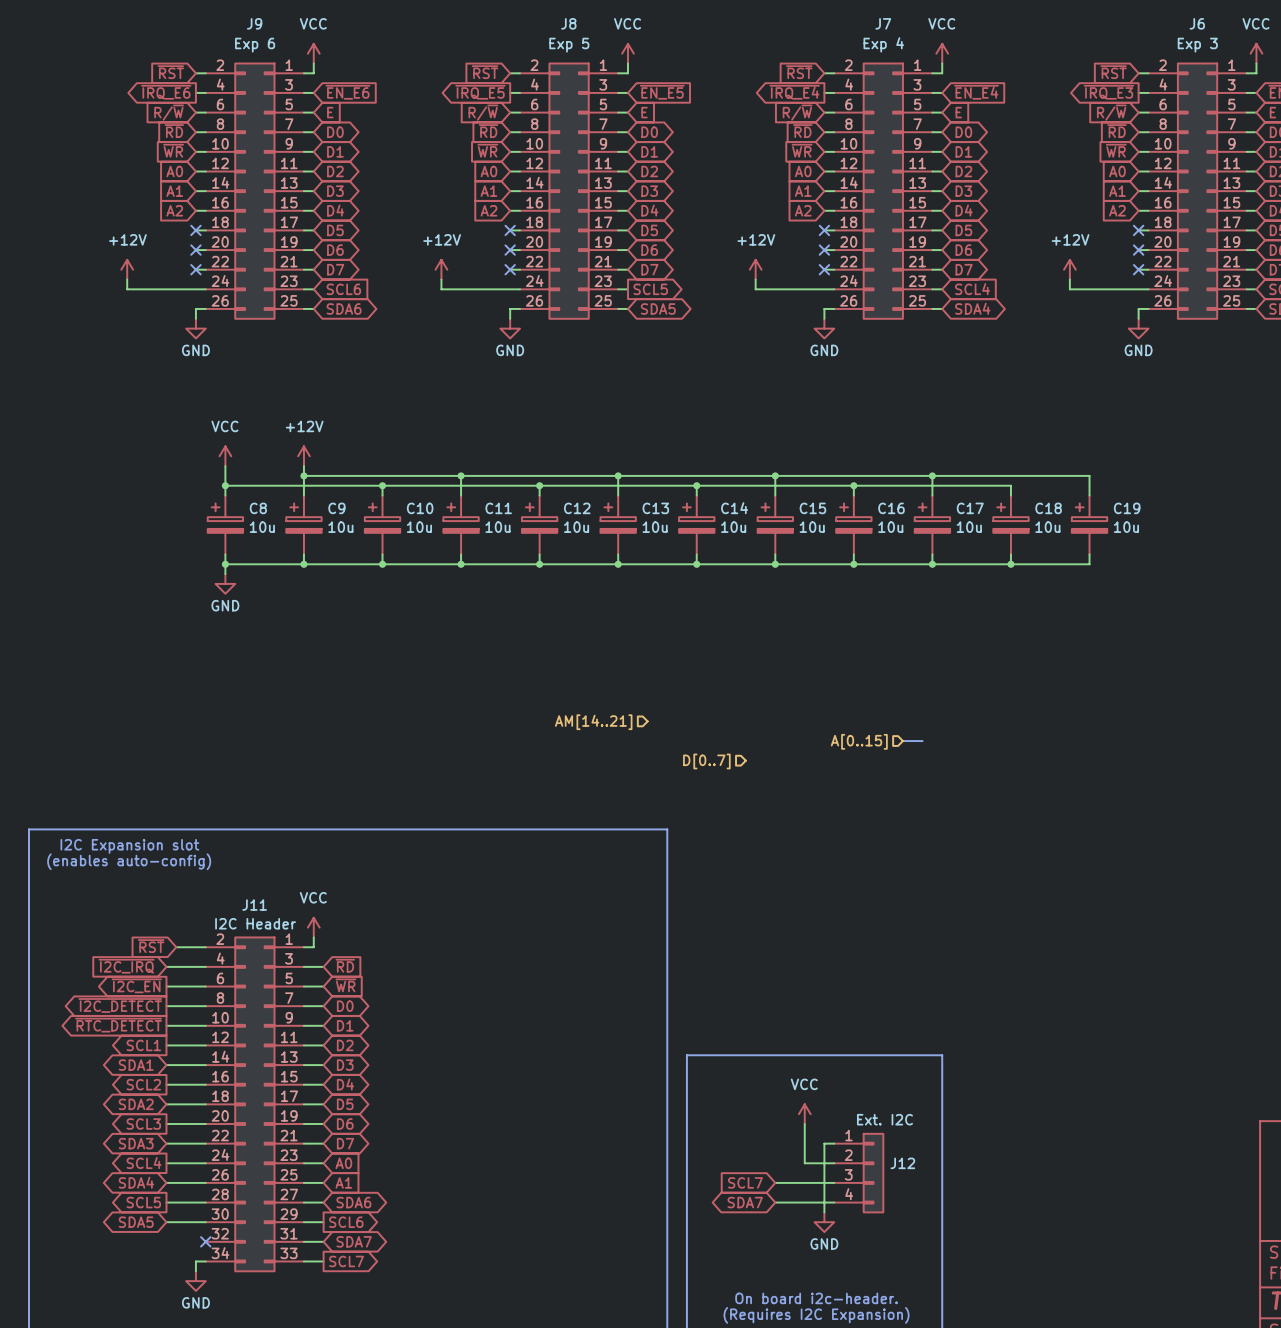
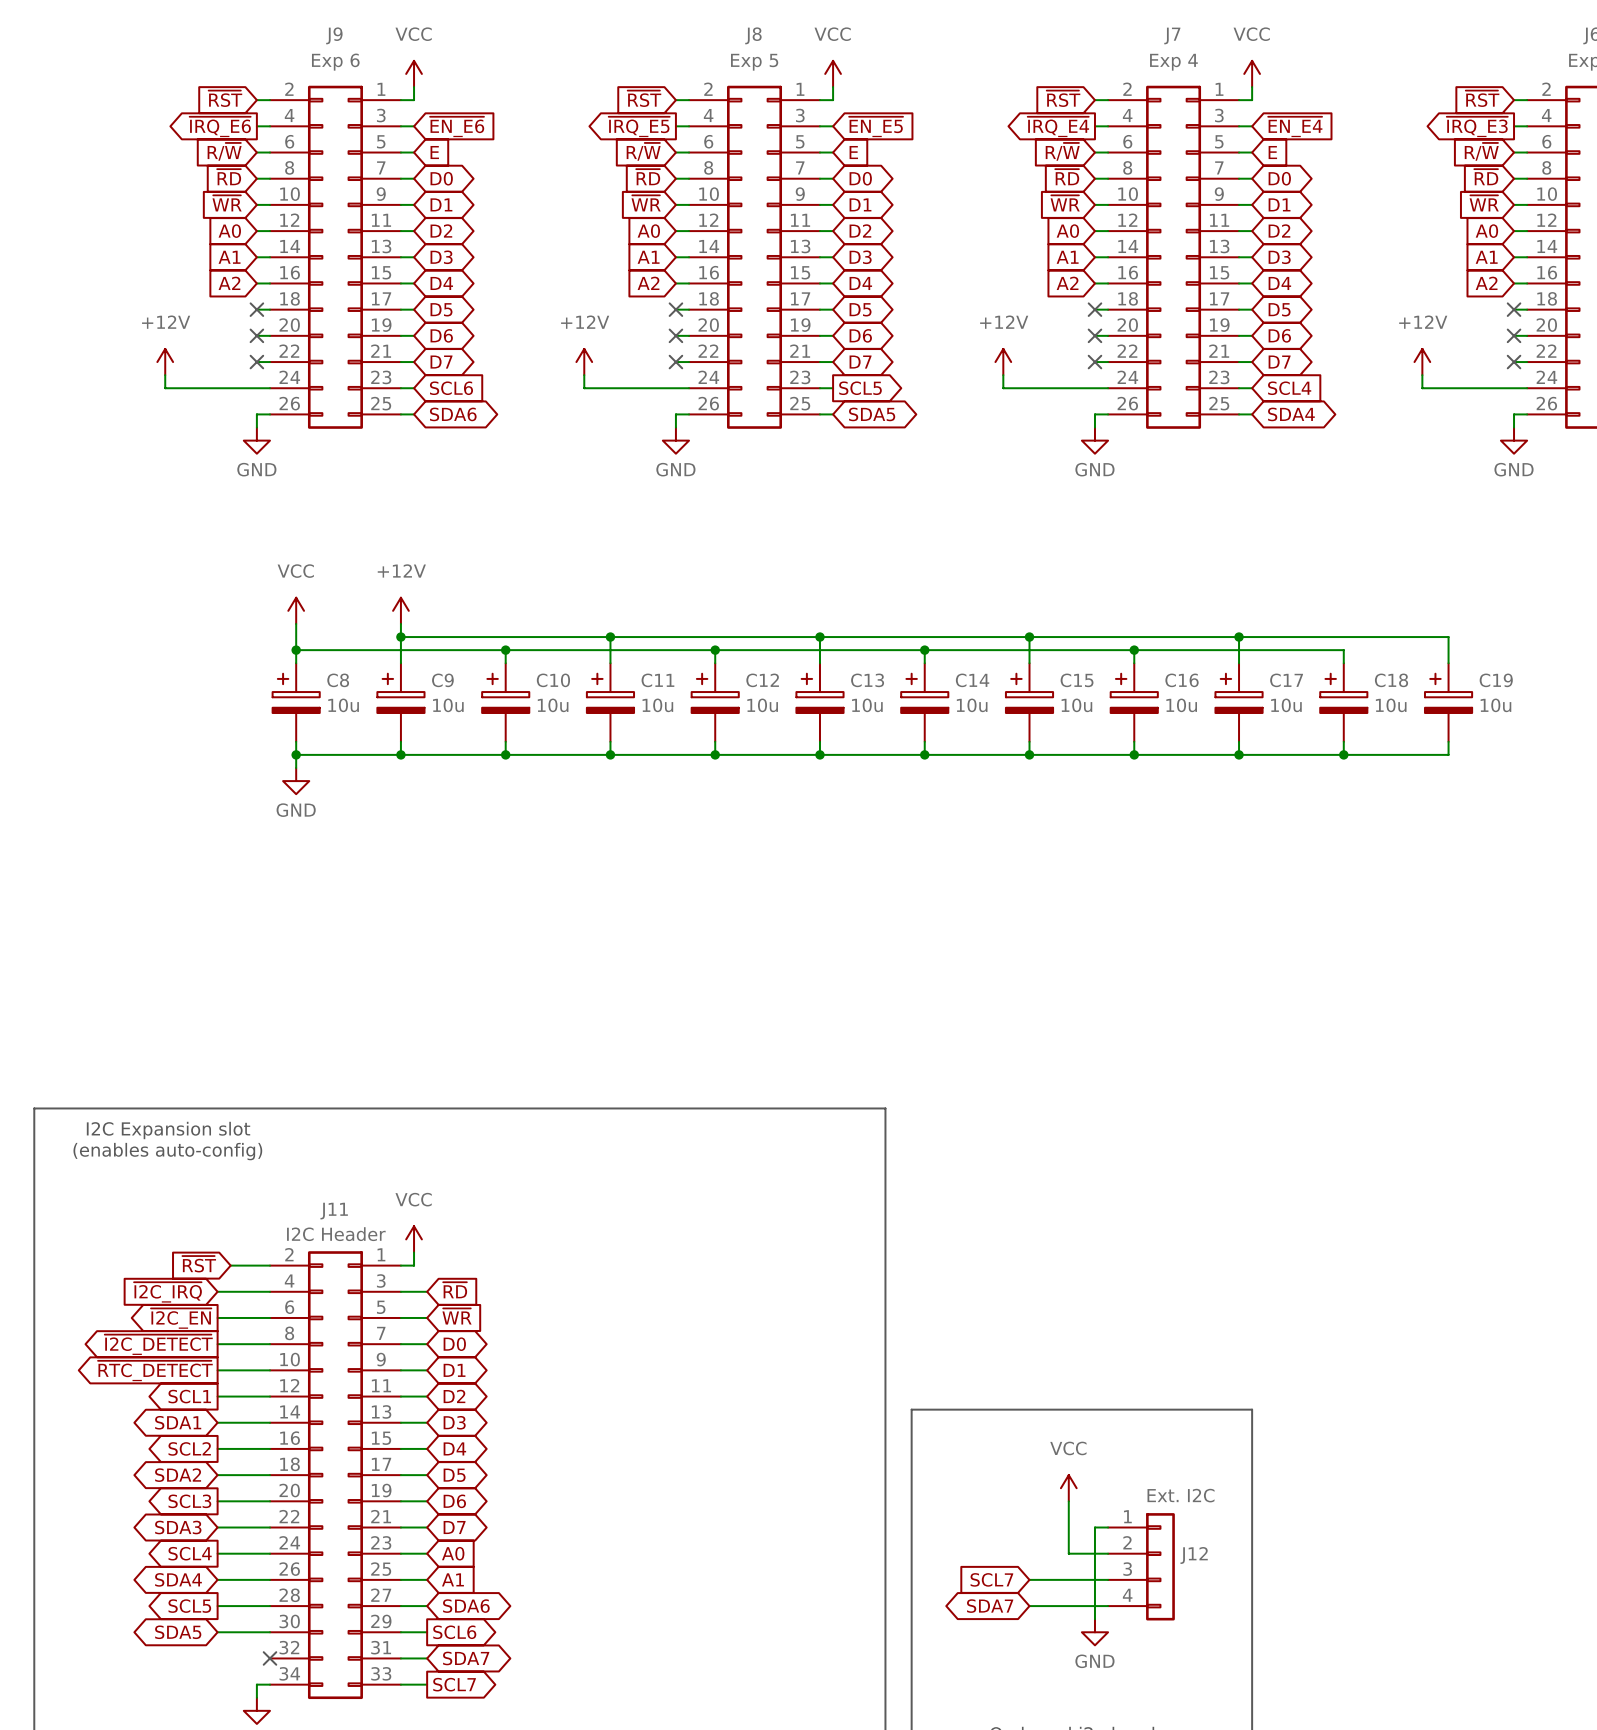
hierarchical label: AM[14..21] (593, 722) -> none
hierarchical label: A[0..15] (859, 741) -> none
bus: (902, 741) (922, 741) -> none
hierarchical label: D[0..7] (706, 761) -> none

